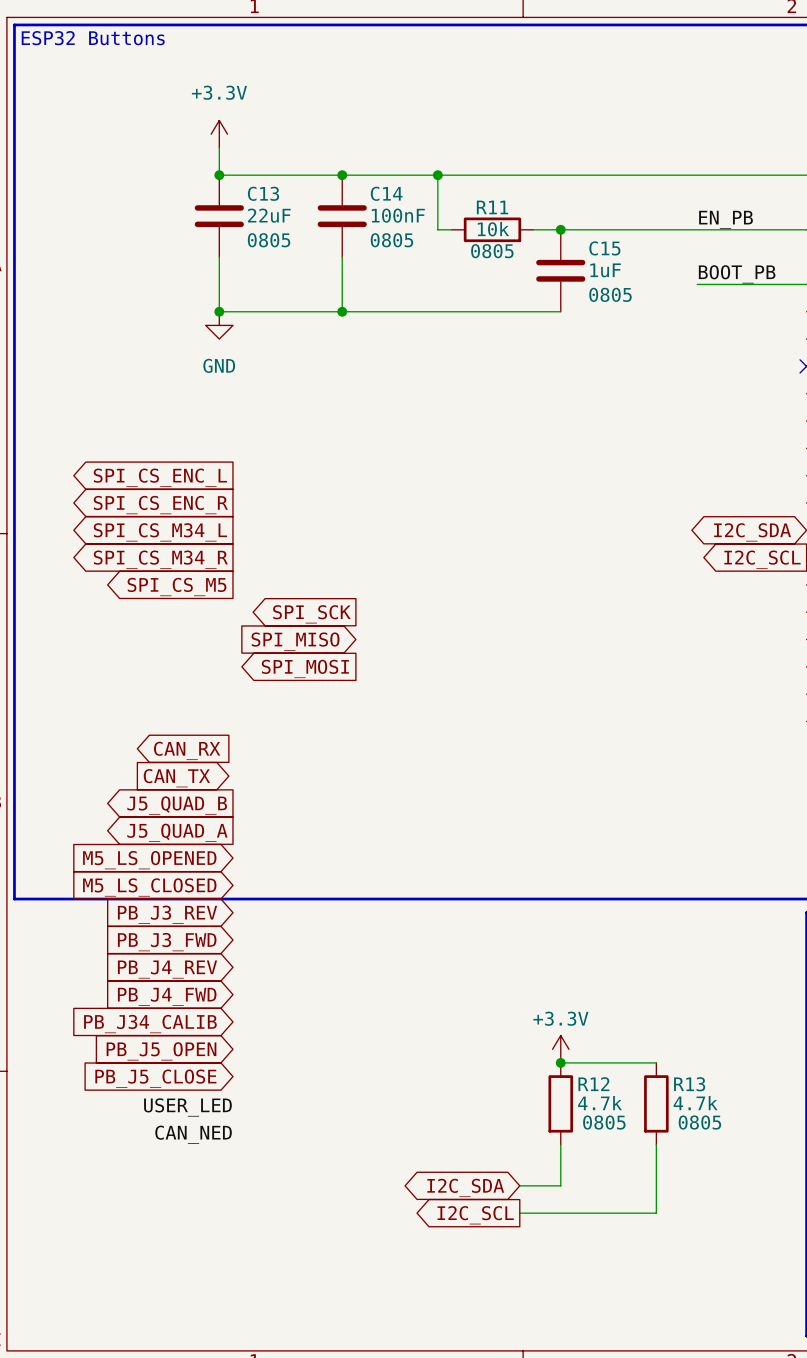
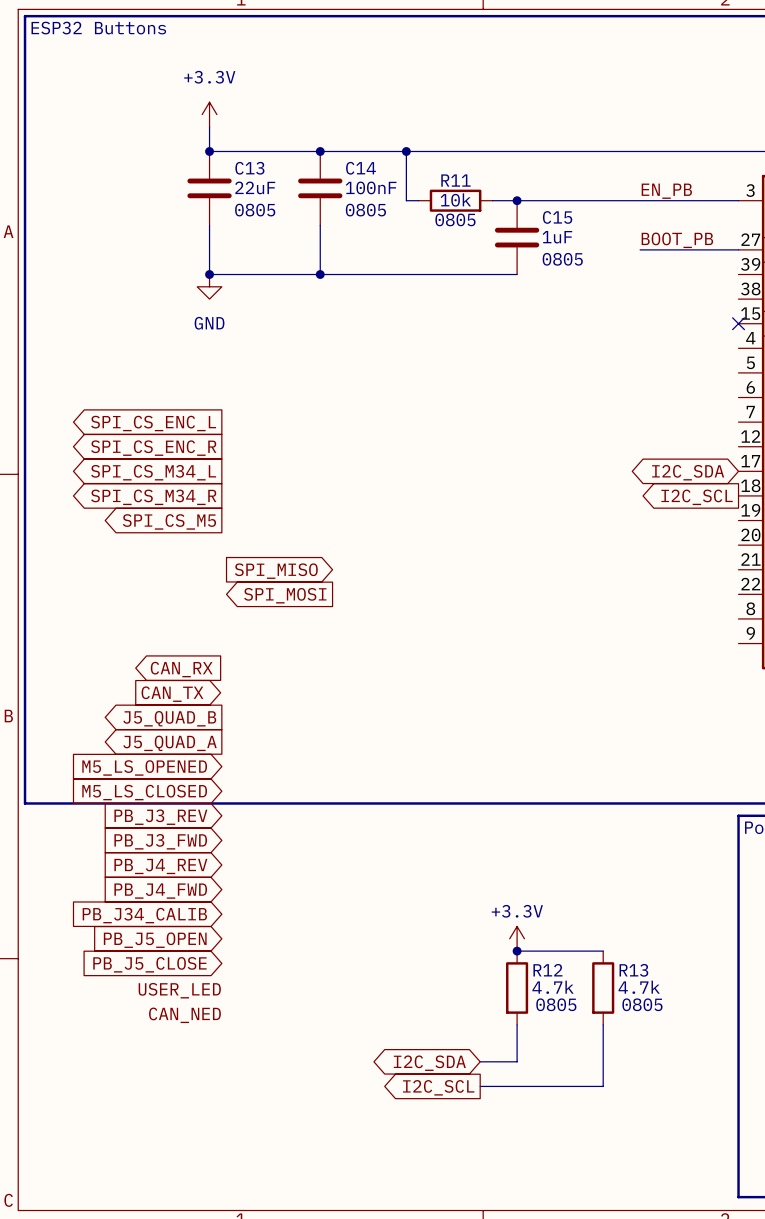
global label: SPI_SCK (311, 614) -> none

